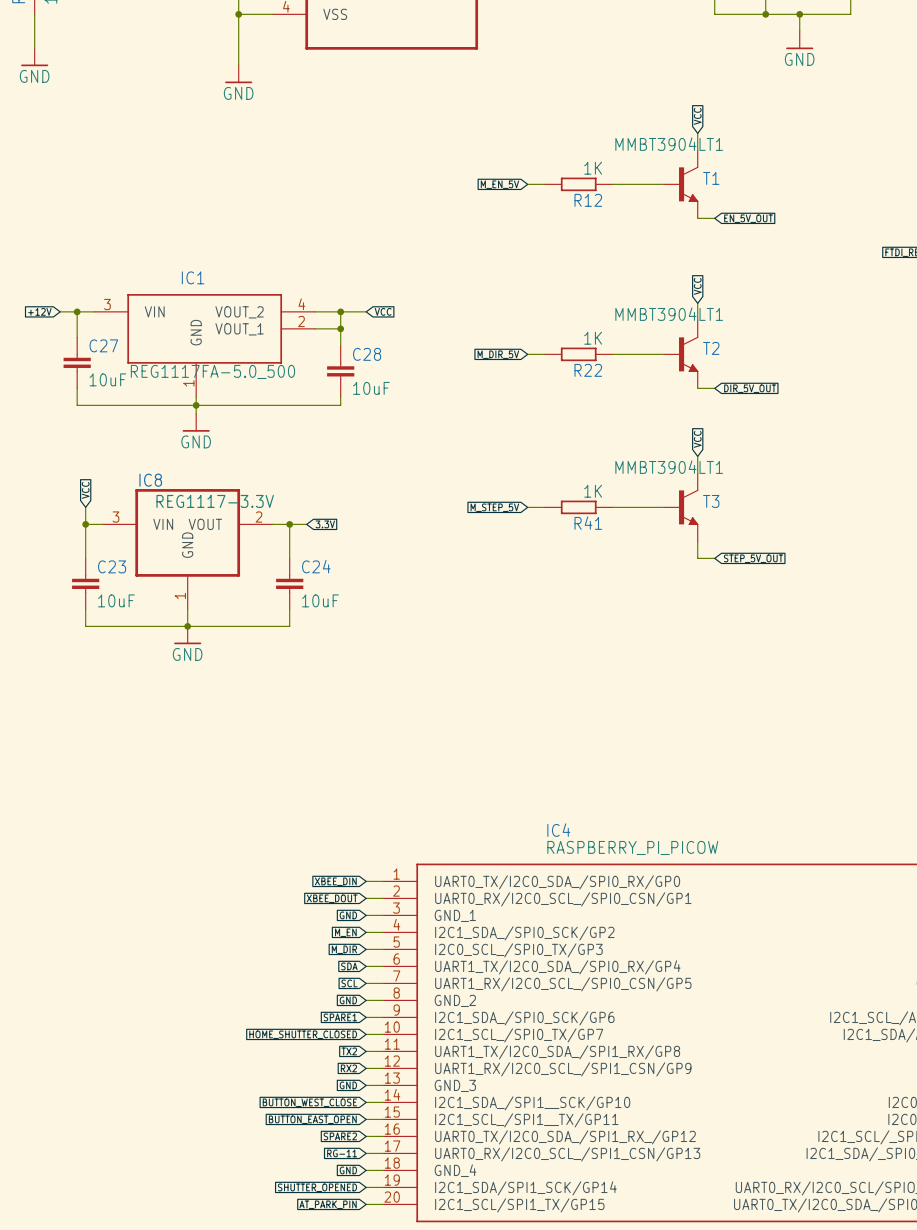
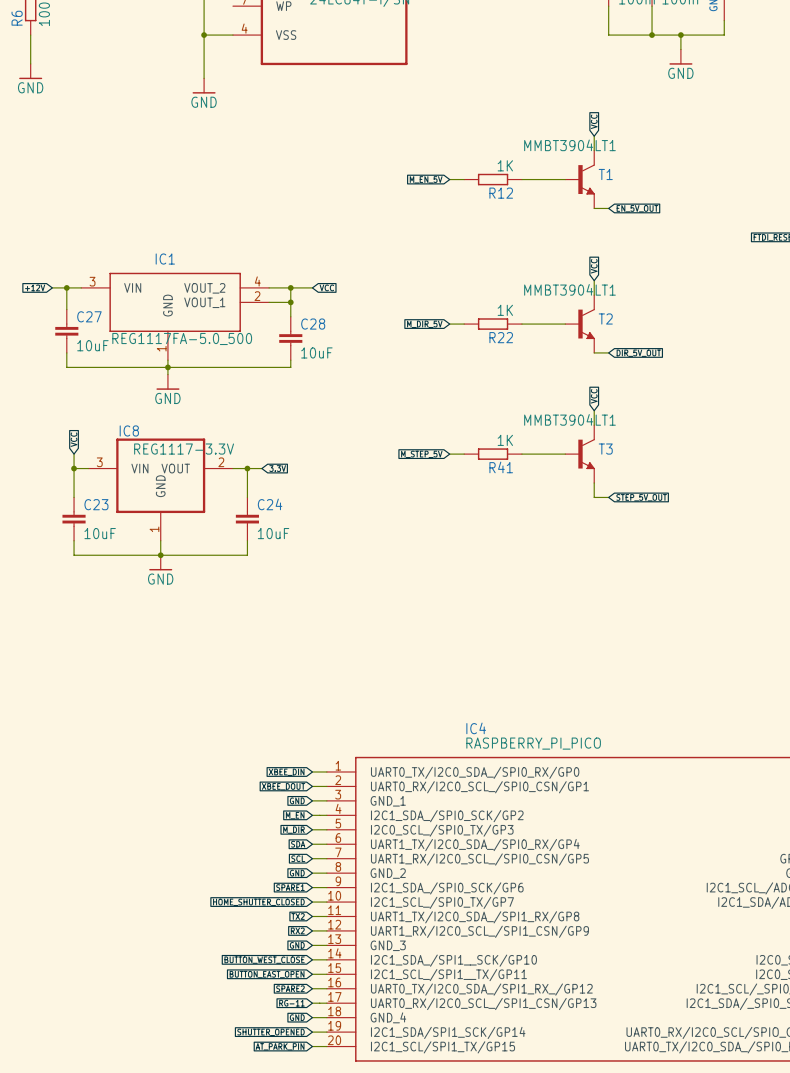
IC4 value: RASPBERRY_PI_PICOW (632, 847) -> RASPBERRY_PI_PICO (533, 743)

